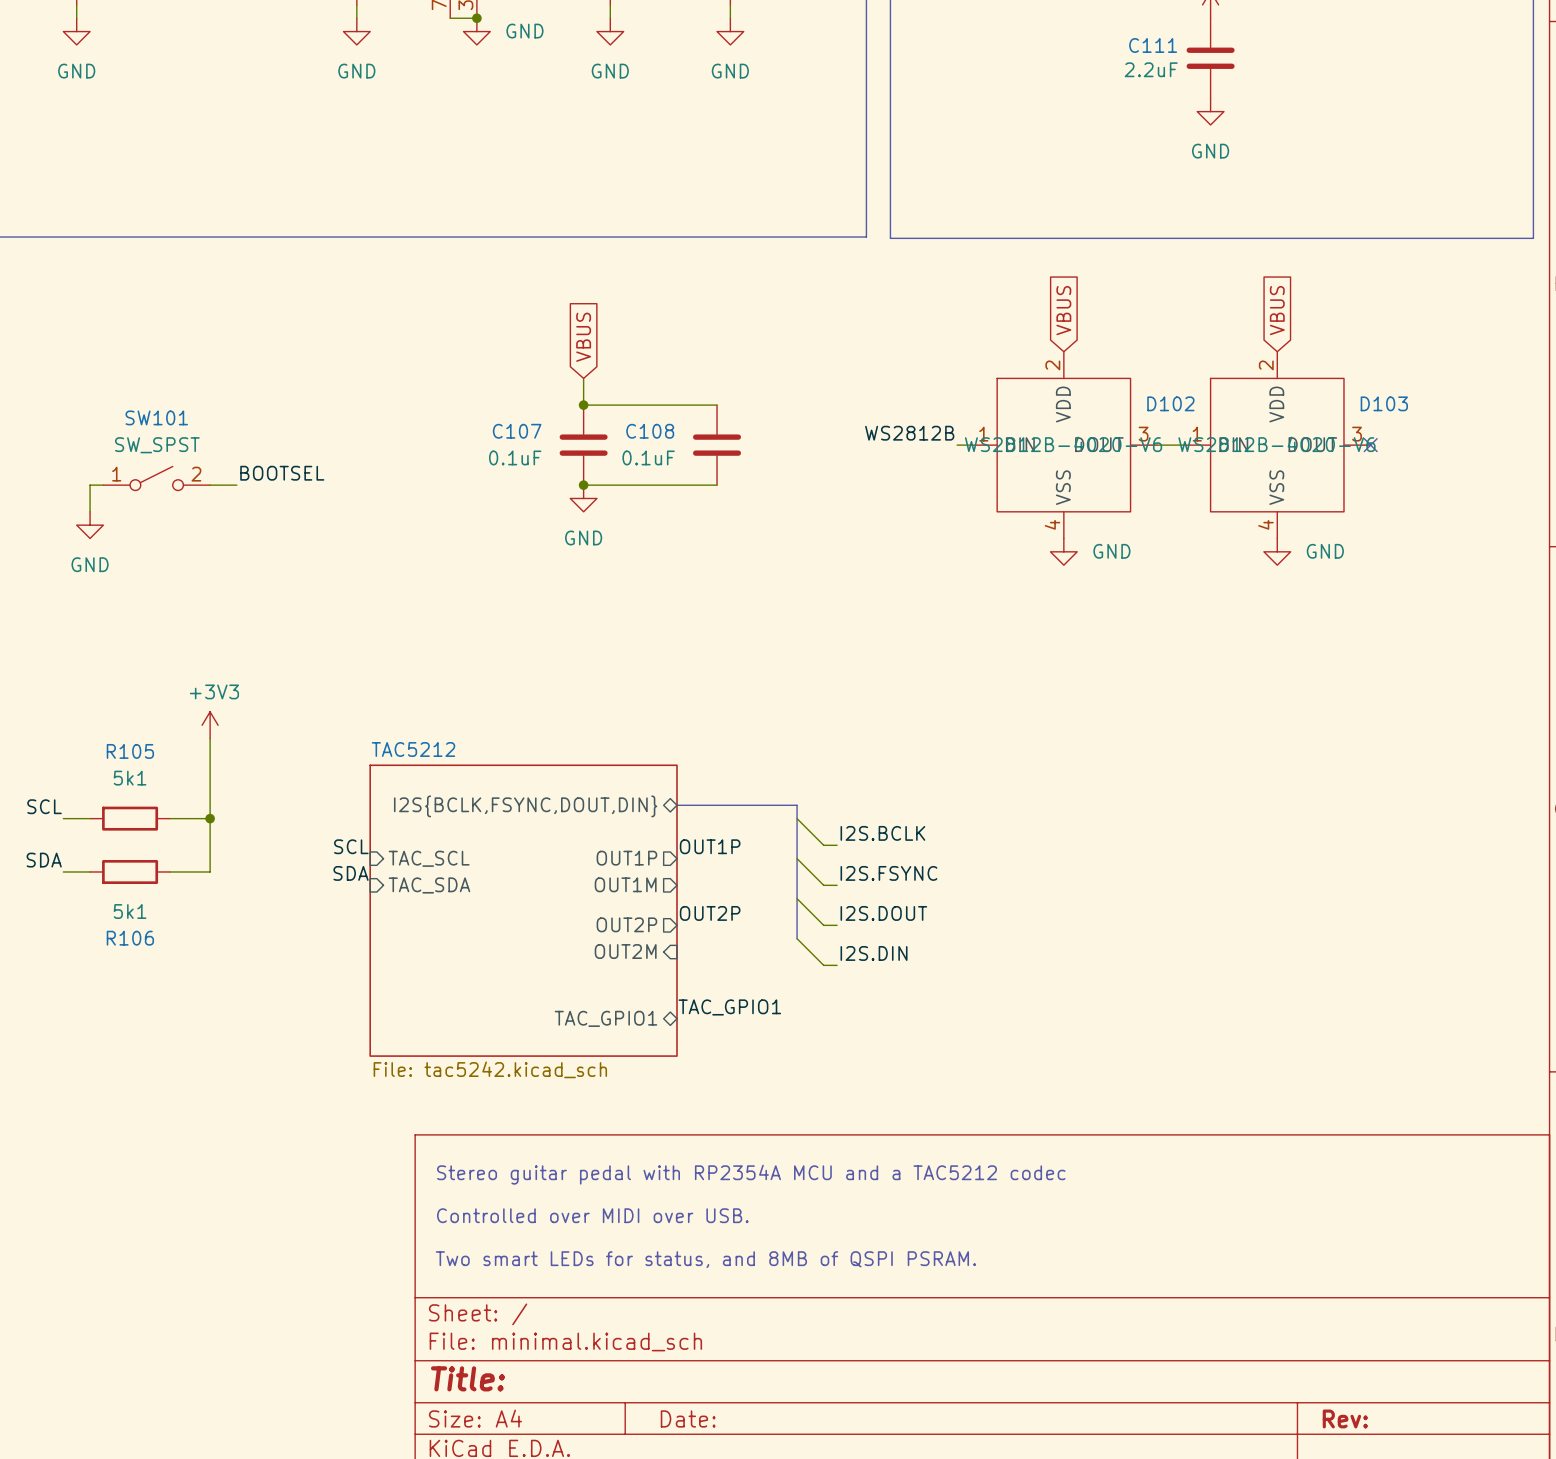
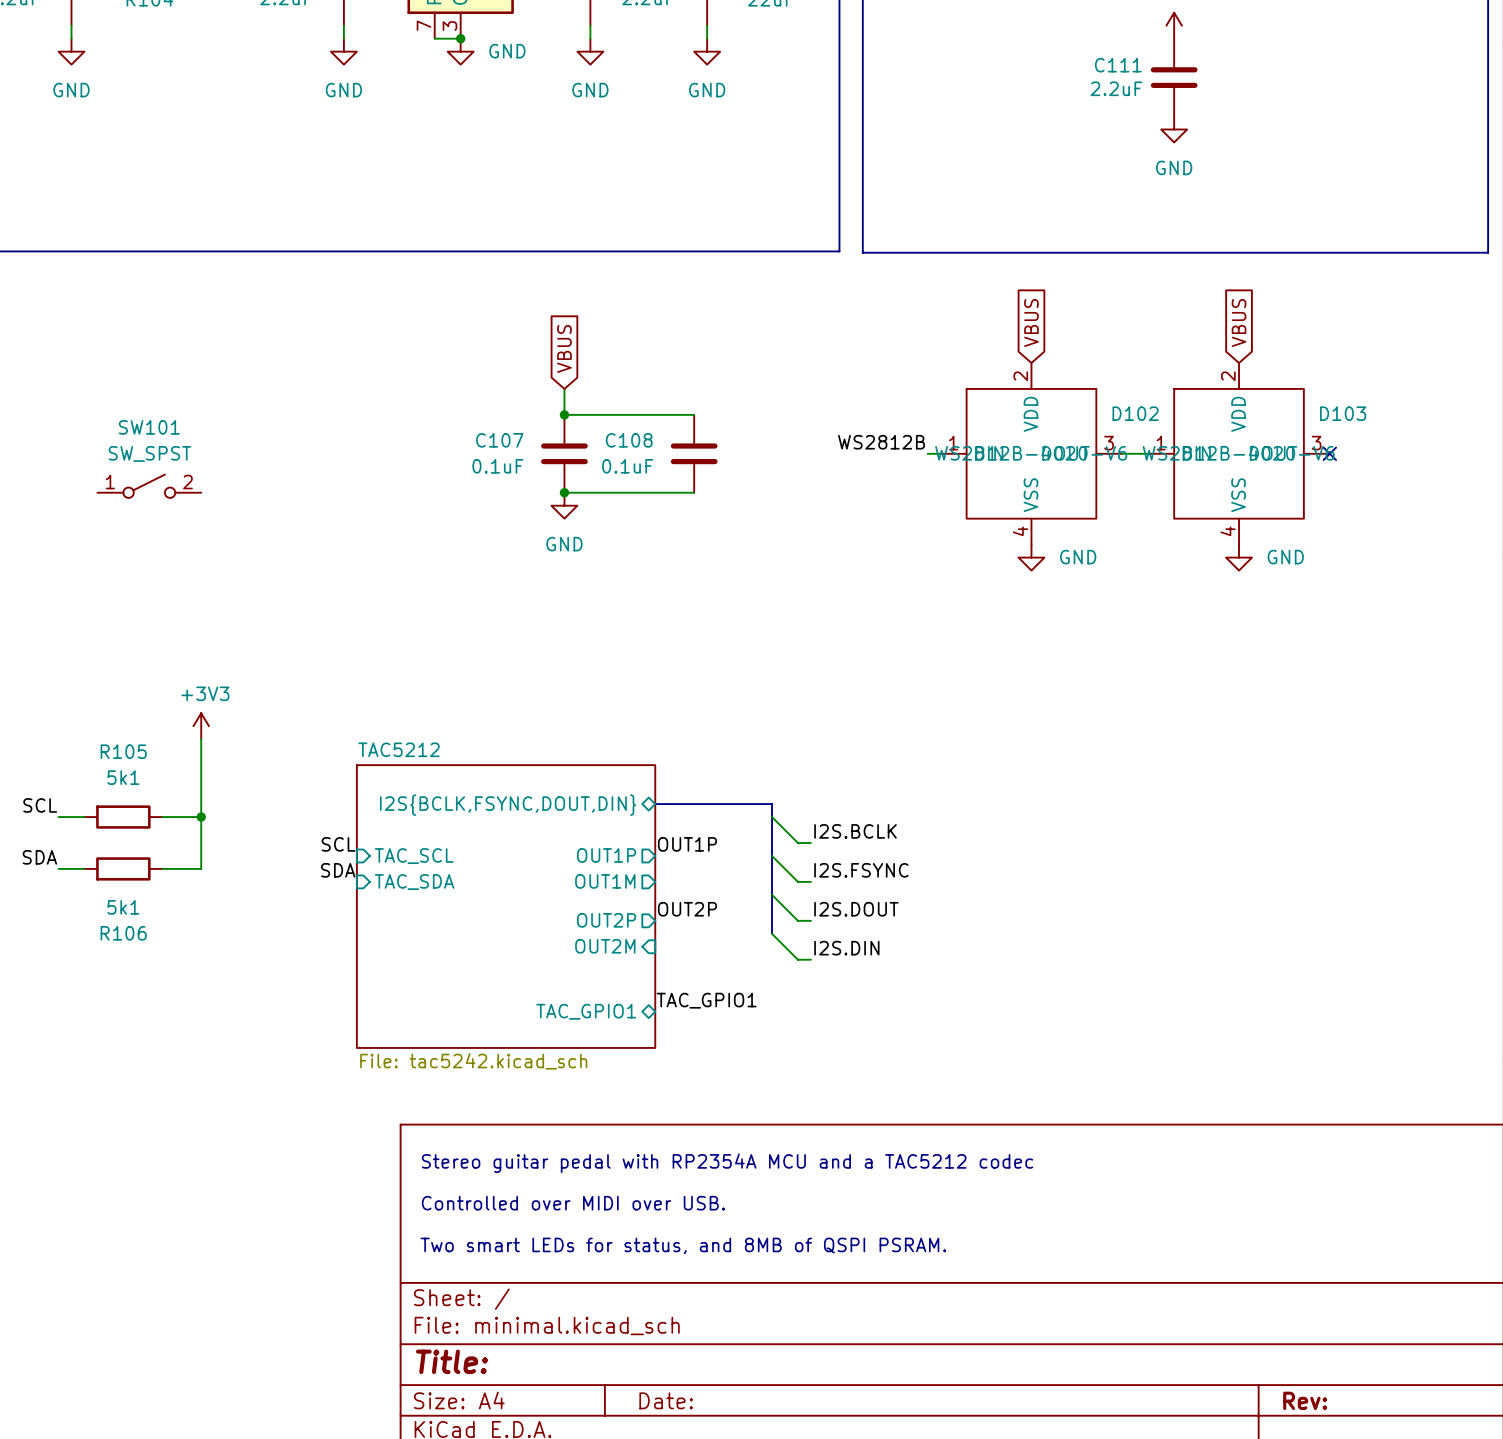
label: BOOTSEL (282, 473) -> none
wire: (103, 485) (90, 485) (90, 511) -> none
wire: (210, 485) (236, 485) -> none
power symbol: GND (90, 525) -> none

